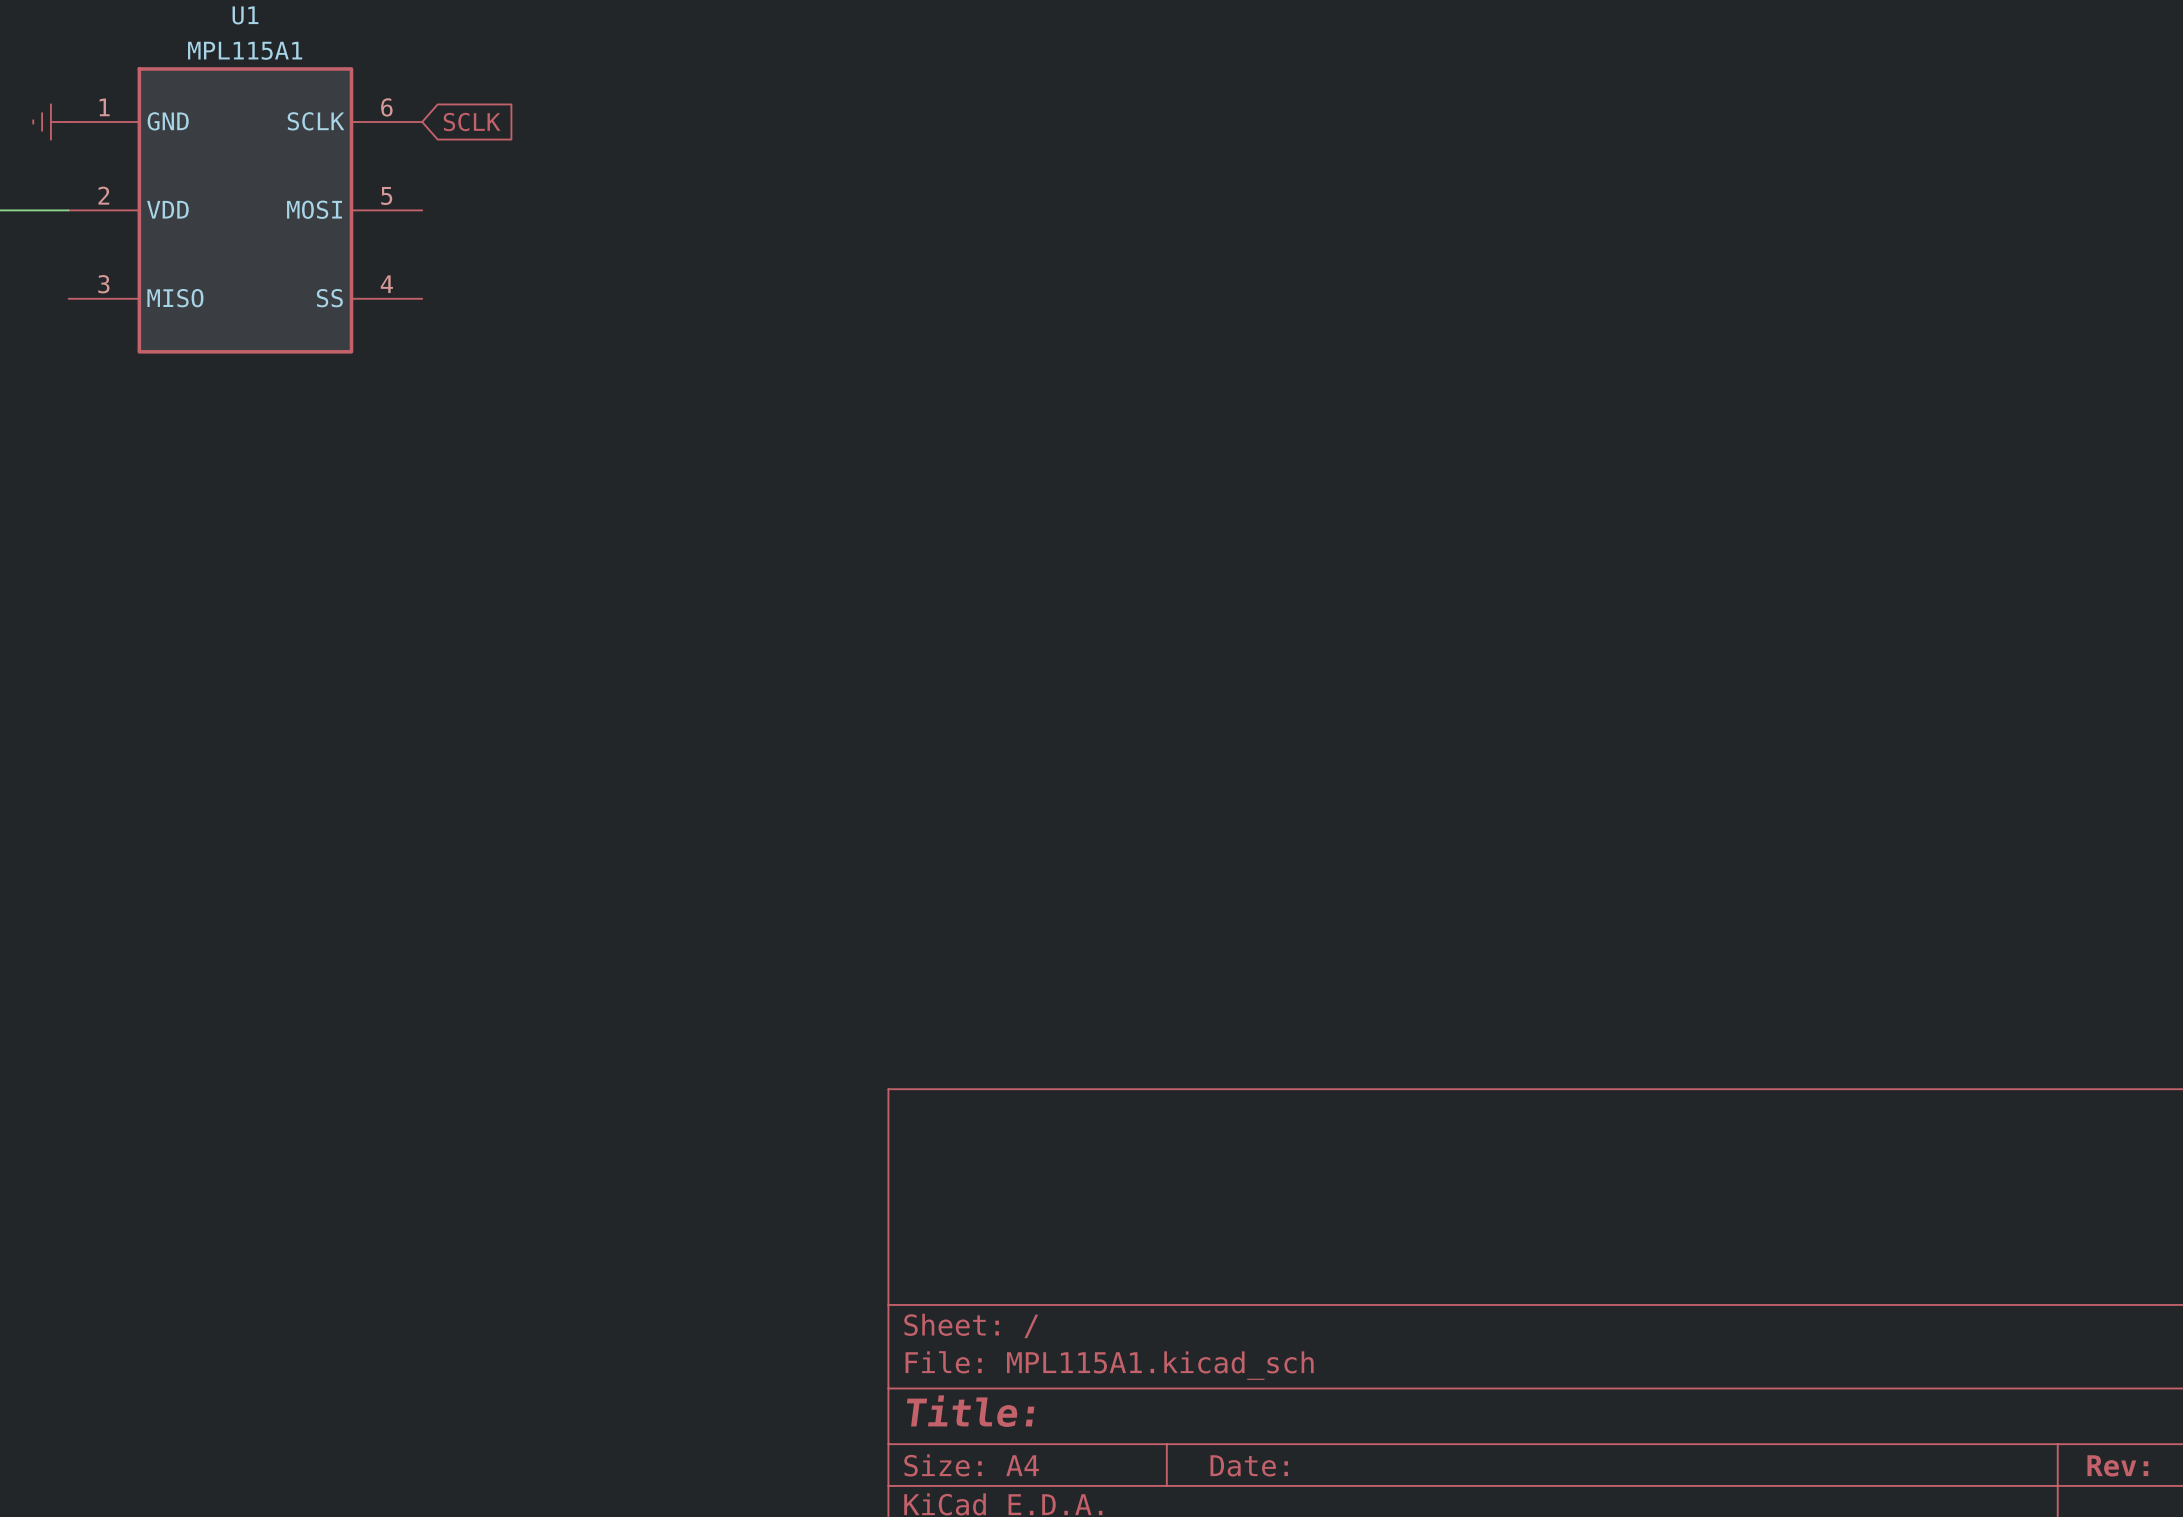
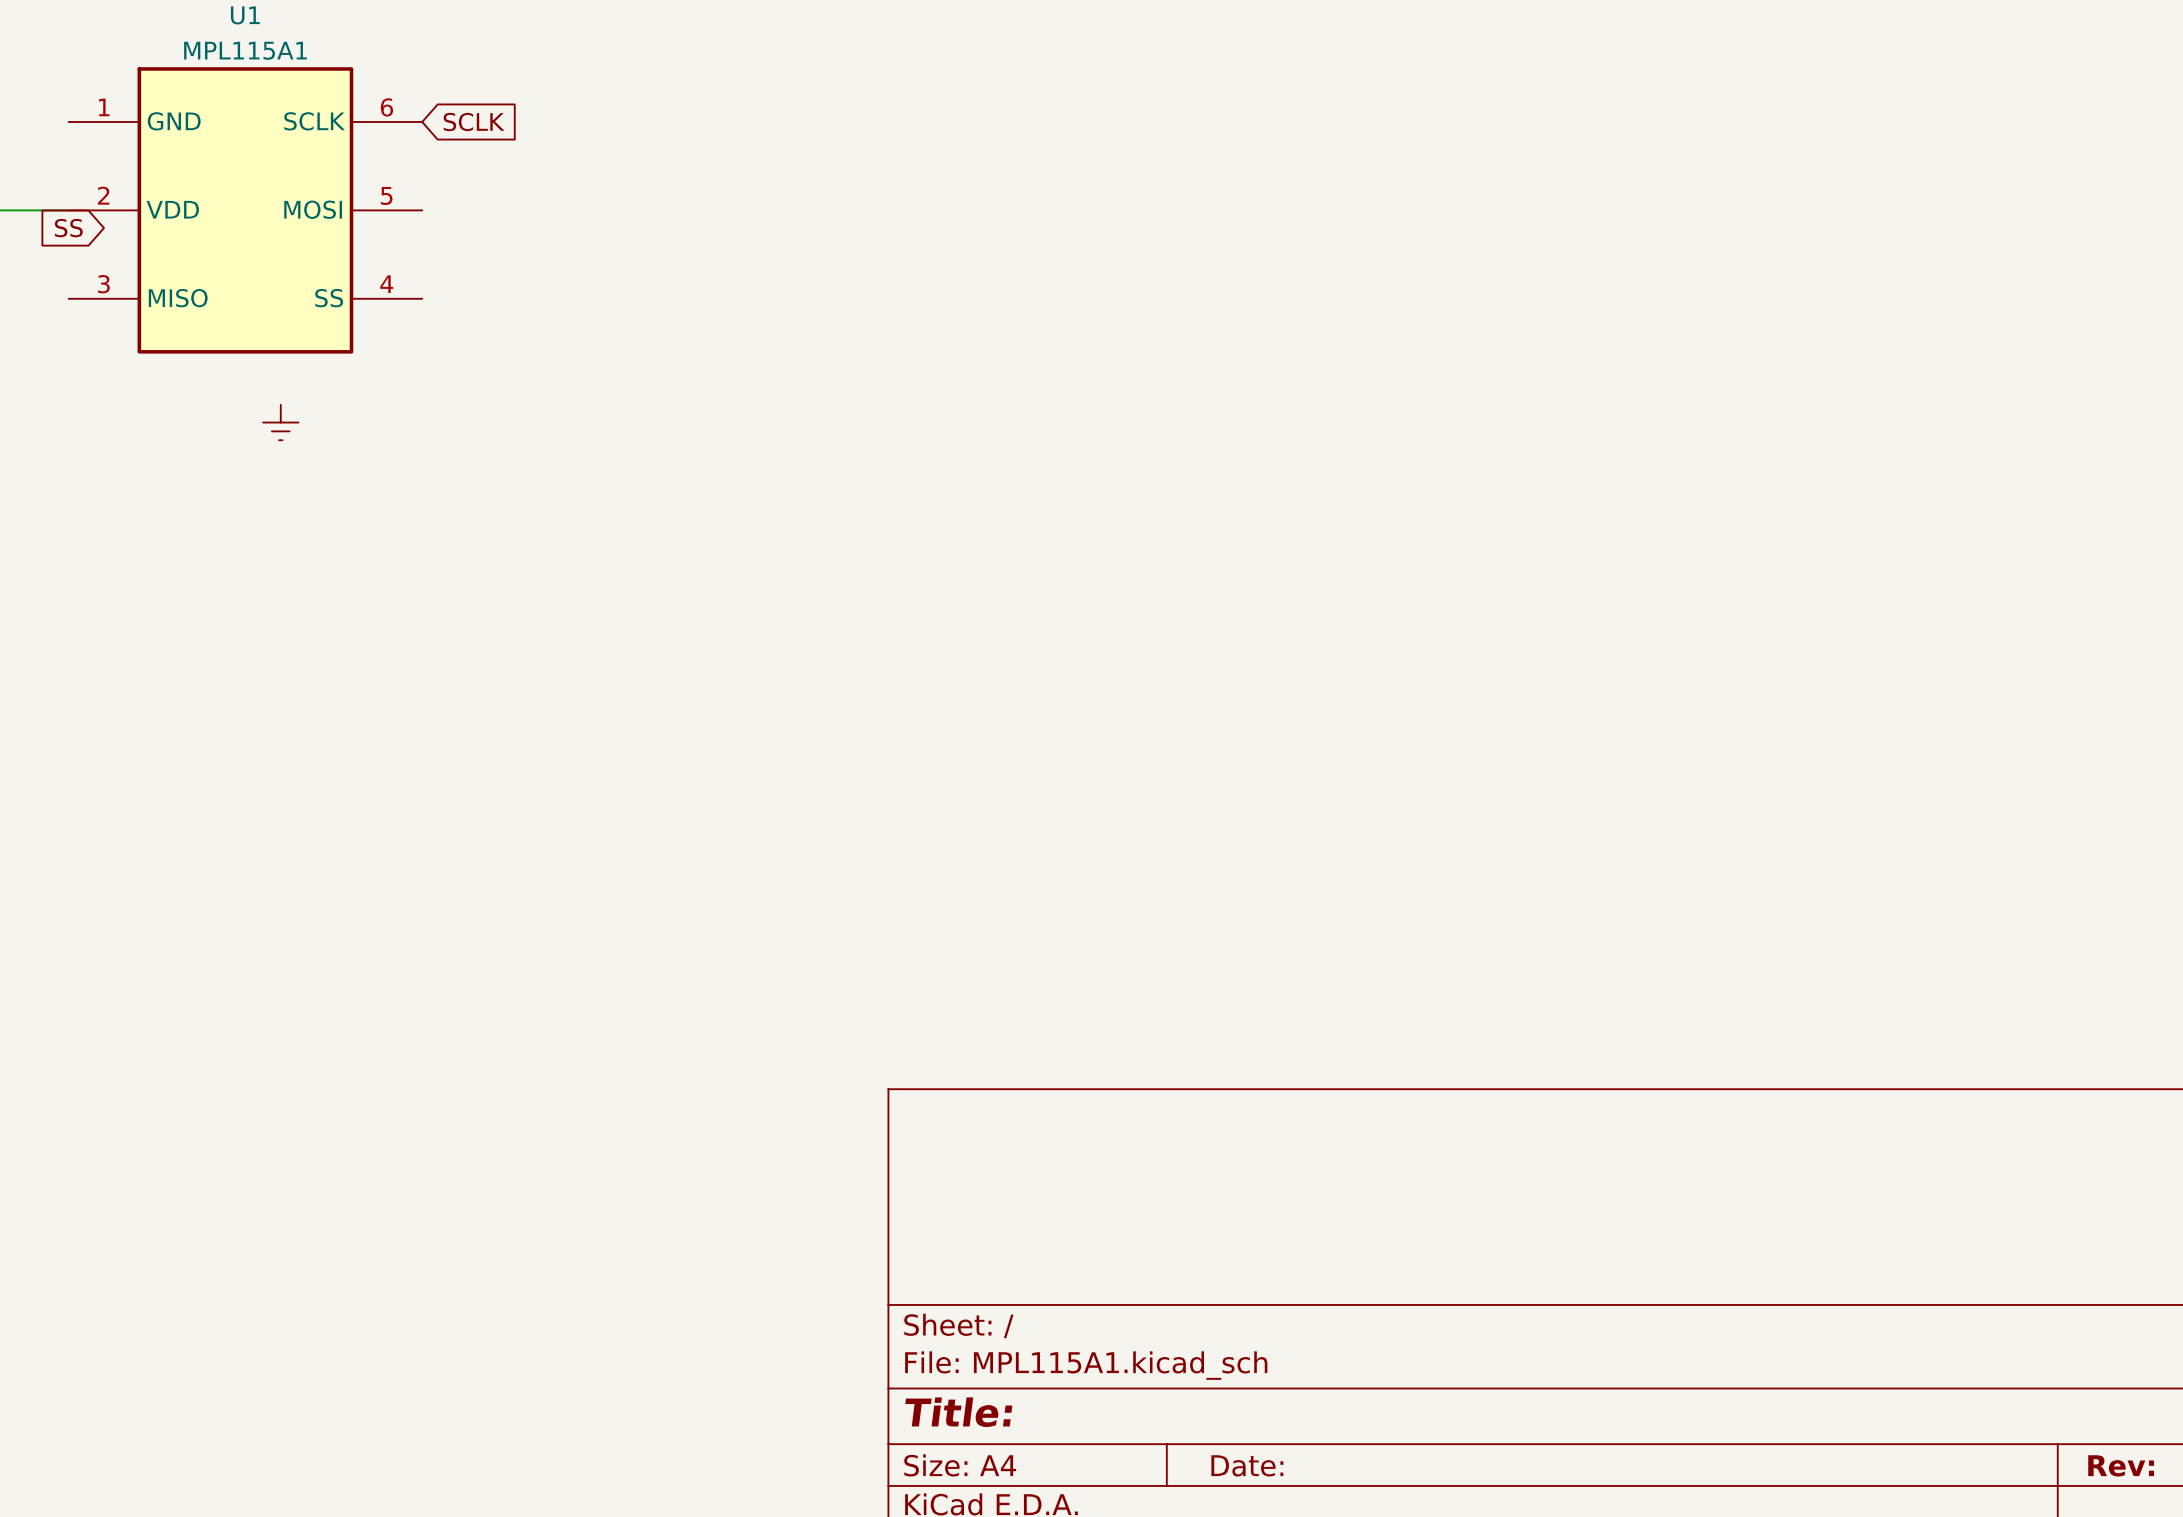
power symbol: (50, 121) -> none
global label: none -> SS (68, 228)
power symbol: none -> (280, 422)

